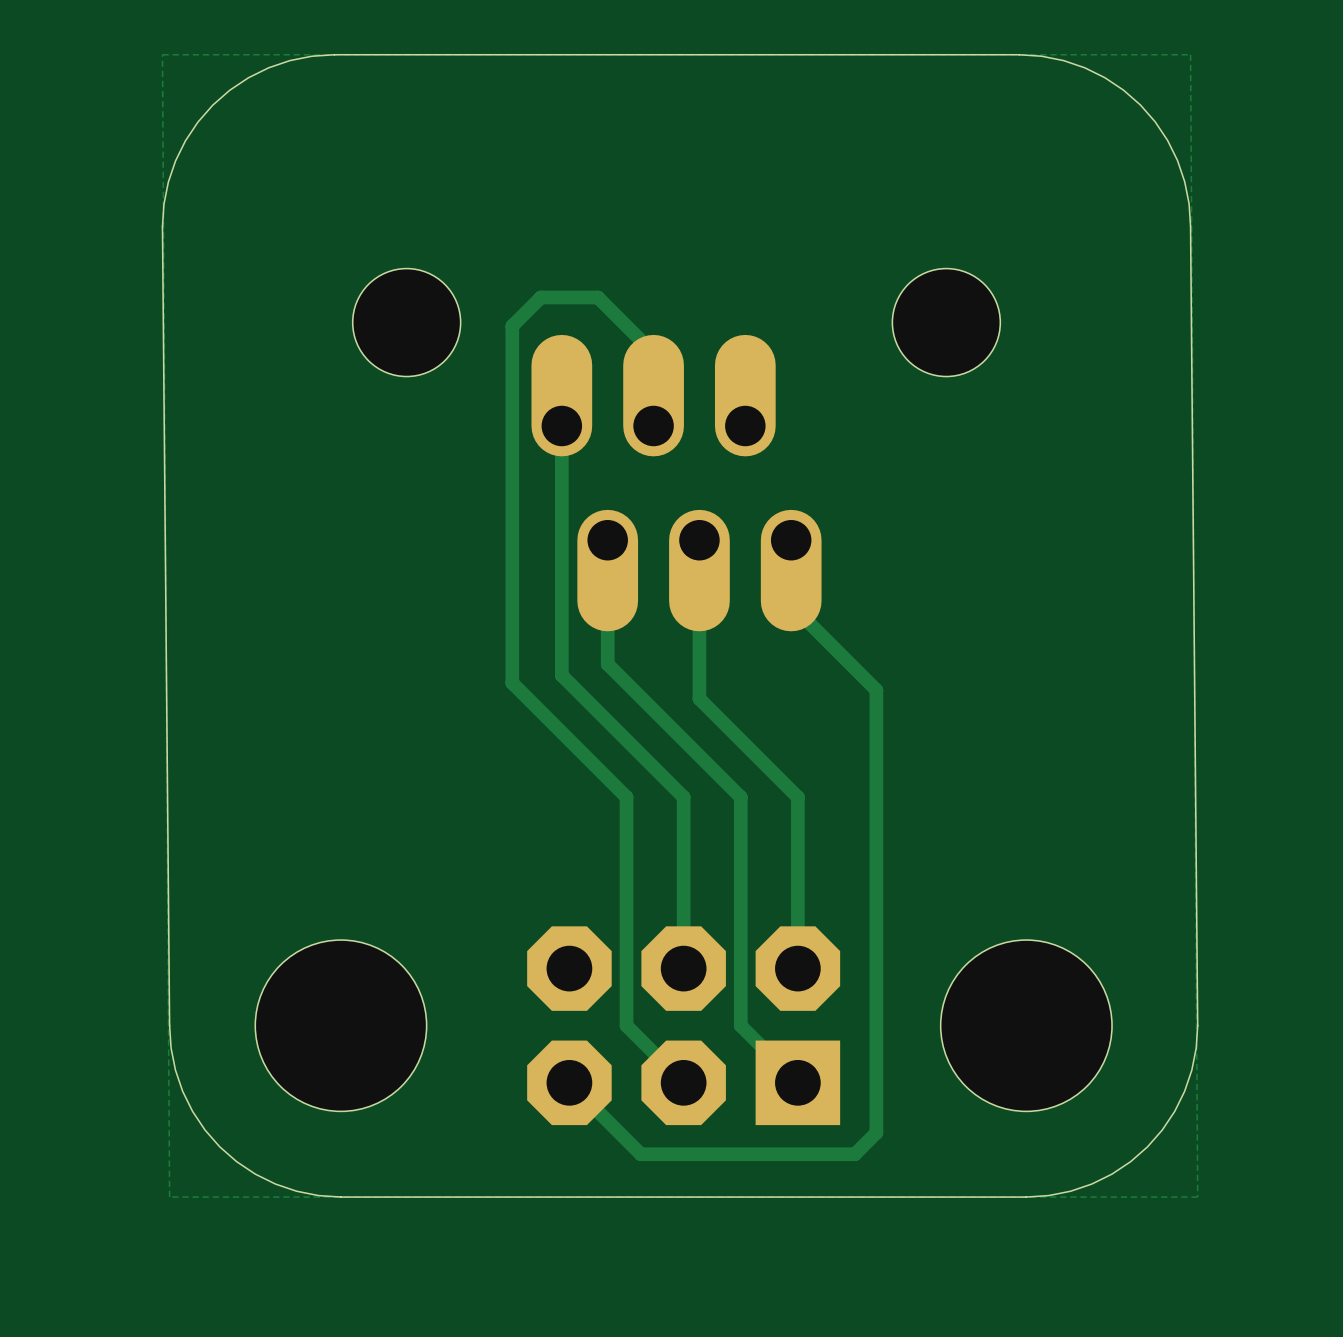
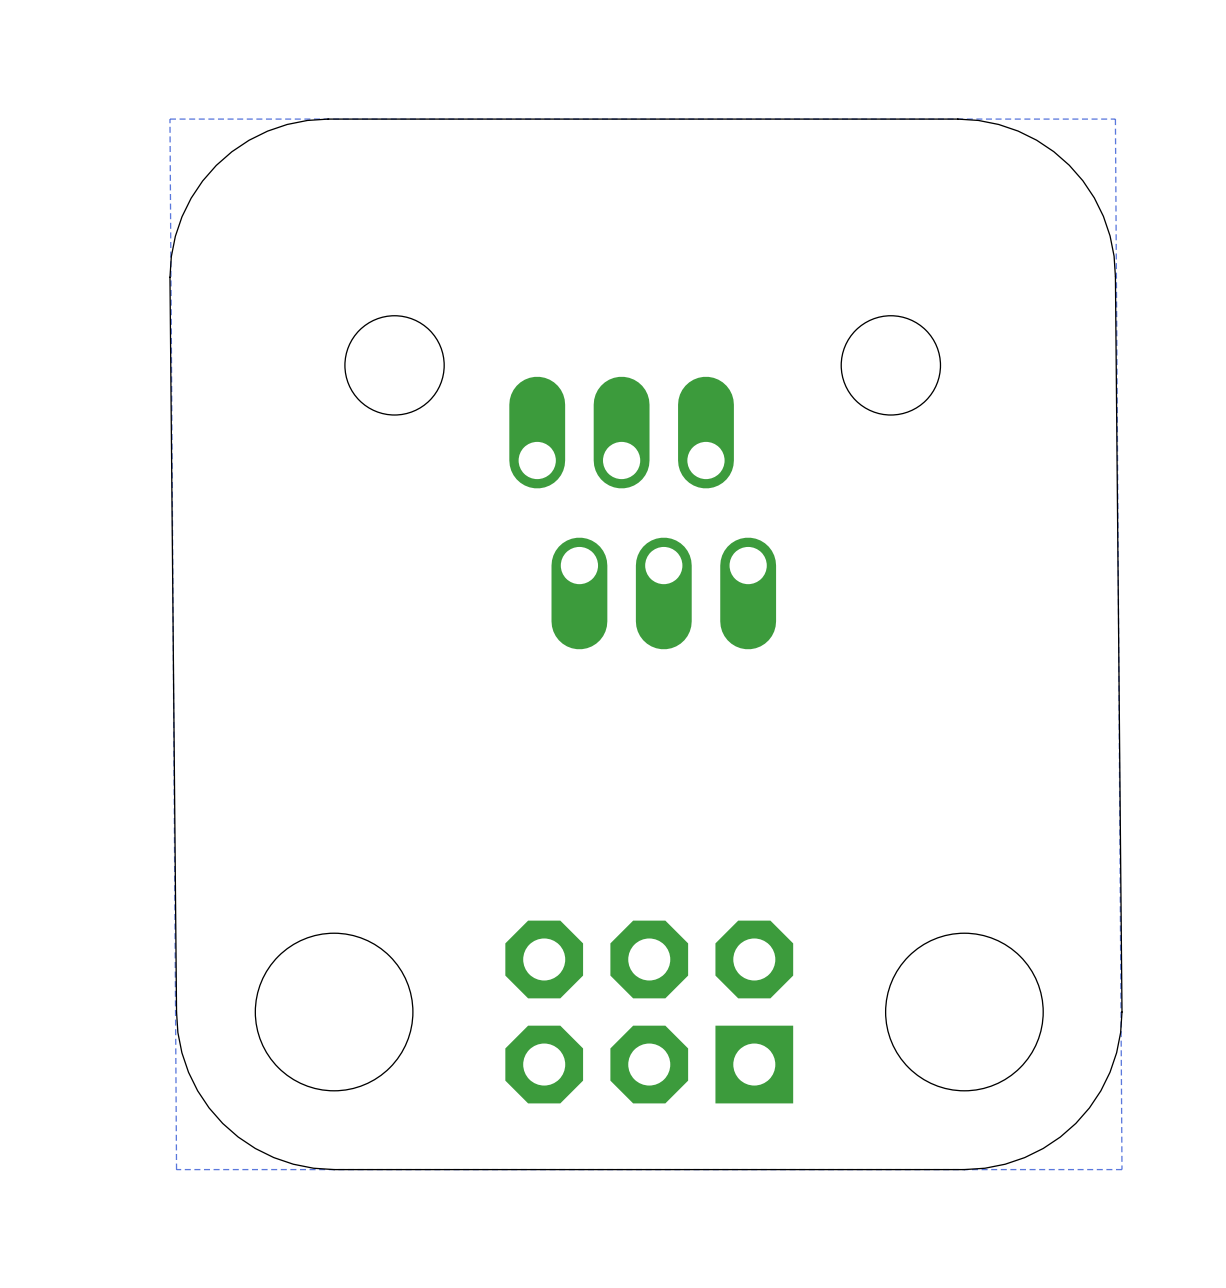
track: (561, 426) (561, 675) (683, 797) (683, 968) -> none
track: (653, 426) (655, 354) (597, 297) (540, 297) (512, 326) (512, 683) (626, 797) (626, 1025) (683, 1082) -> none
track: (607, 540) (607, 664) (740, 797) (740, 1025) (797, 1082) -> none
track: (699, 540) (699, 698) (797, 797) (797, 968) -> none
track: (790, 540) (790, 604) (876, 690) (876, 1132) (855, 1154) (640, 1154) (569, 1082) -> none

